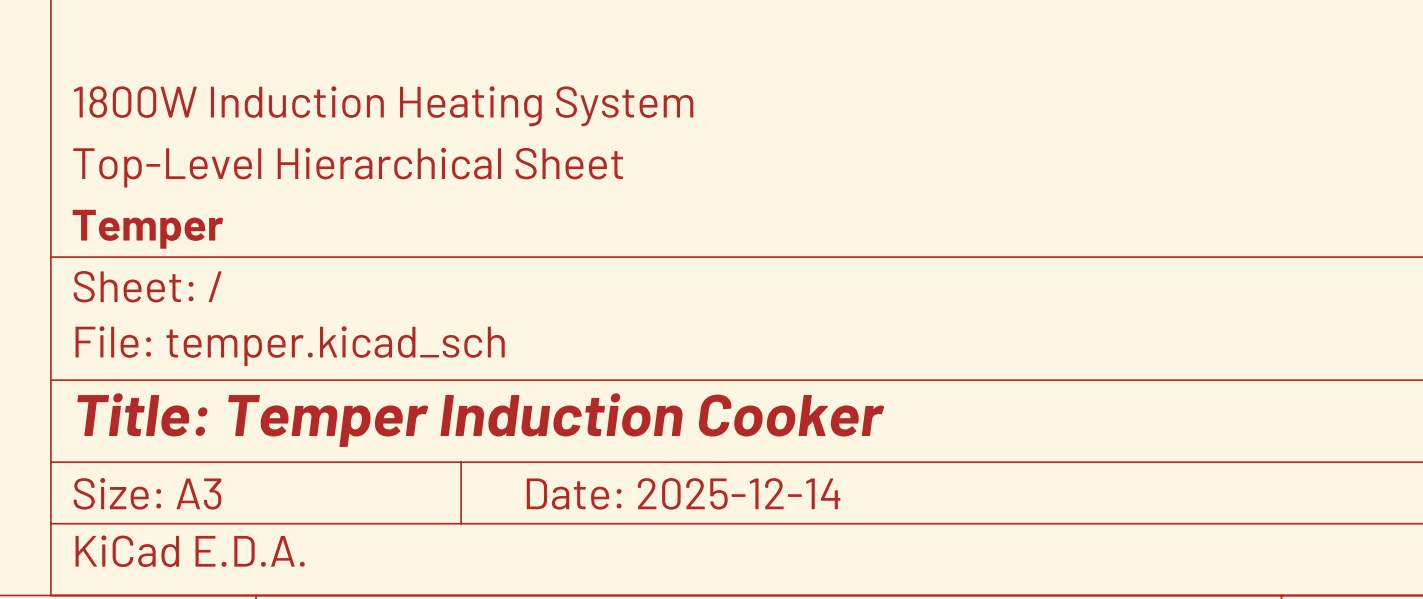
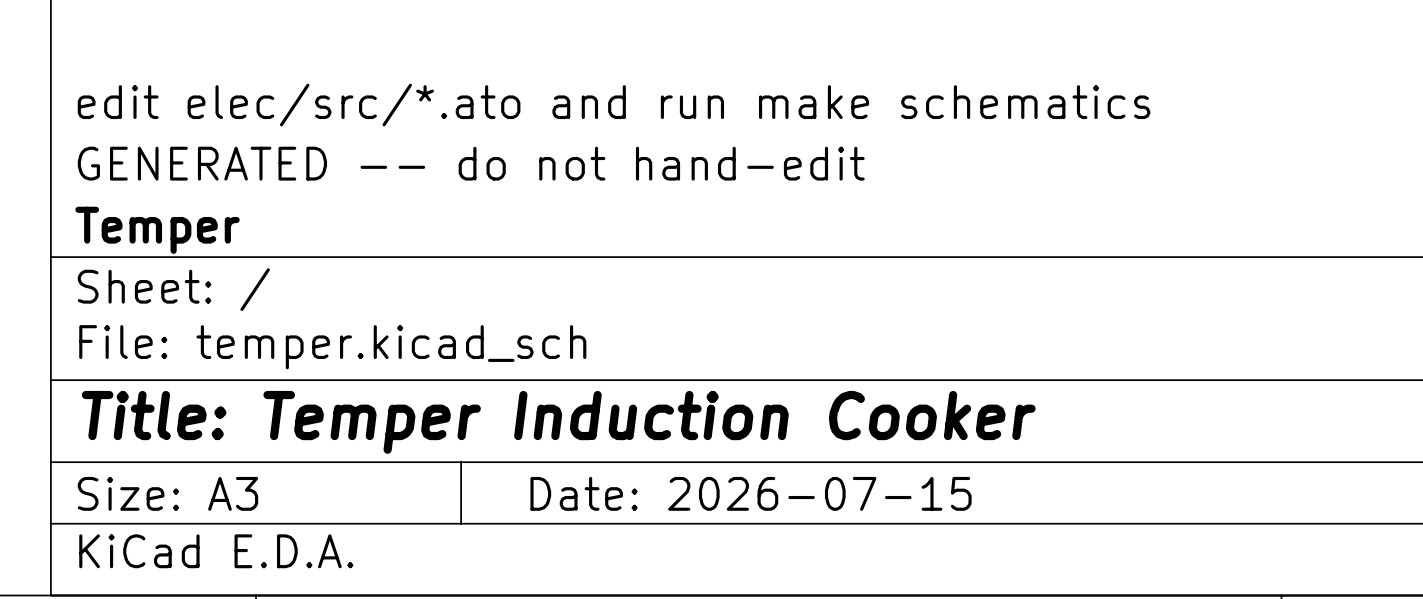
title block: 1800W Induction Heating System (383, 106) -> edit elec/src/*.ato and run make schematics (614, 105)
title block: Top-Level Hierarchical Sheet (348, 167) -> GENERATED -- do not hand-edit (471, 163)
title block: Date: 2025-12-14 (683, 493) -> Date: 2026-07-15 (751, 493)

